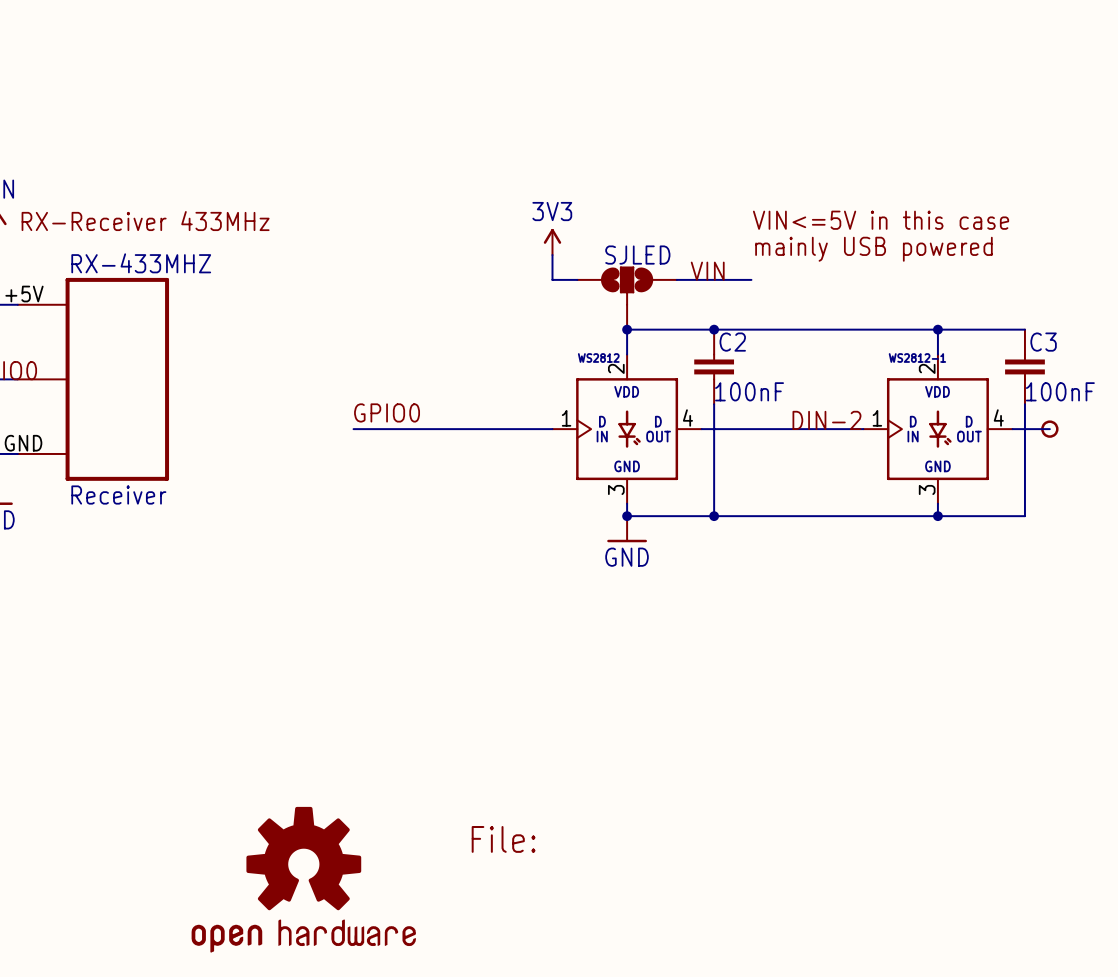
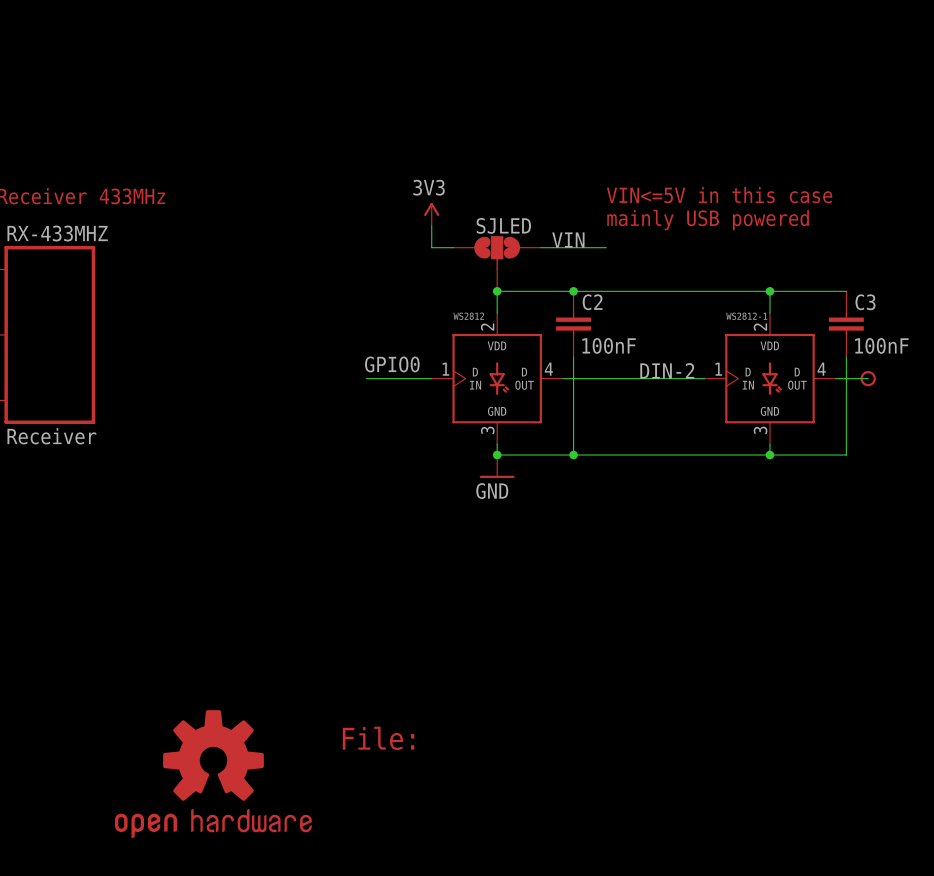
label position: GPIO0 (387, 412) -> GPIO0 (392, 364)
wire: (353, 429) (477, 429) -> none

